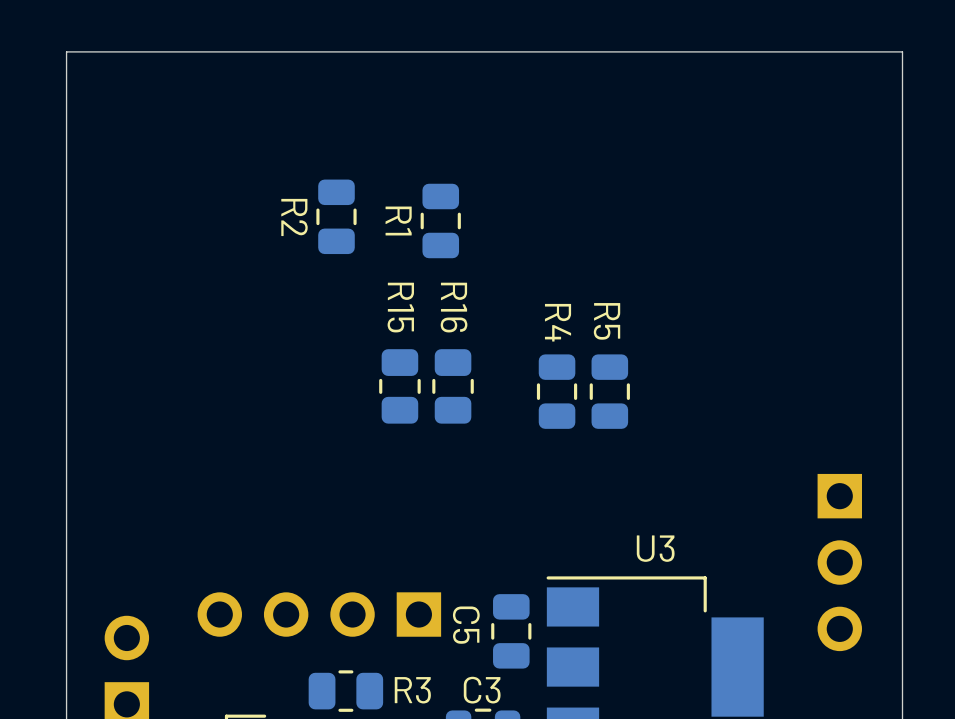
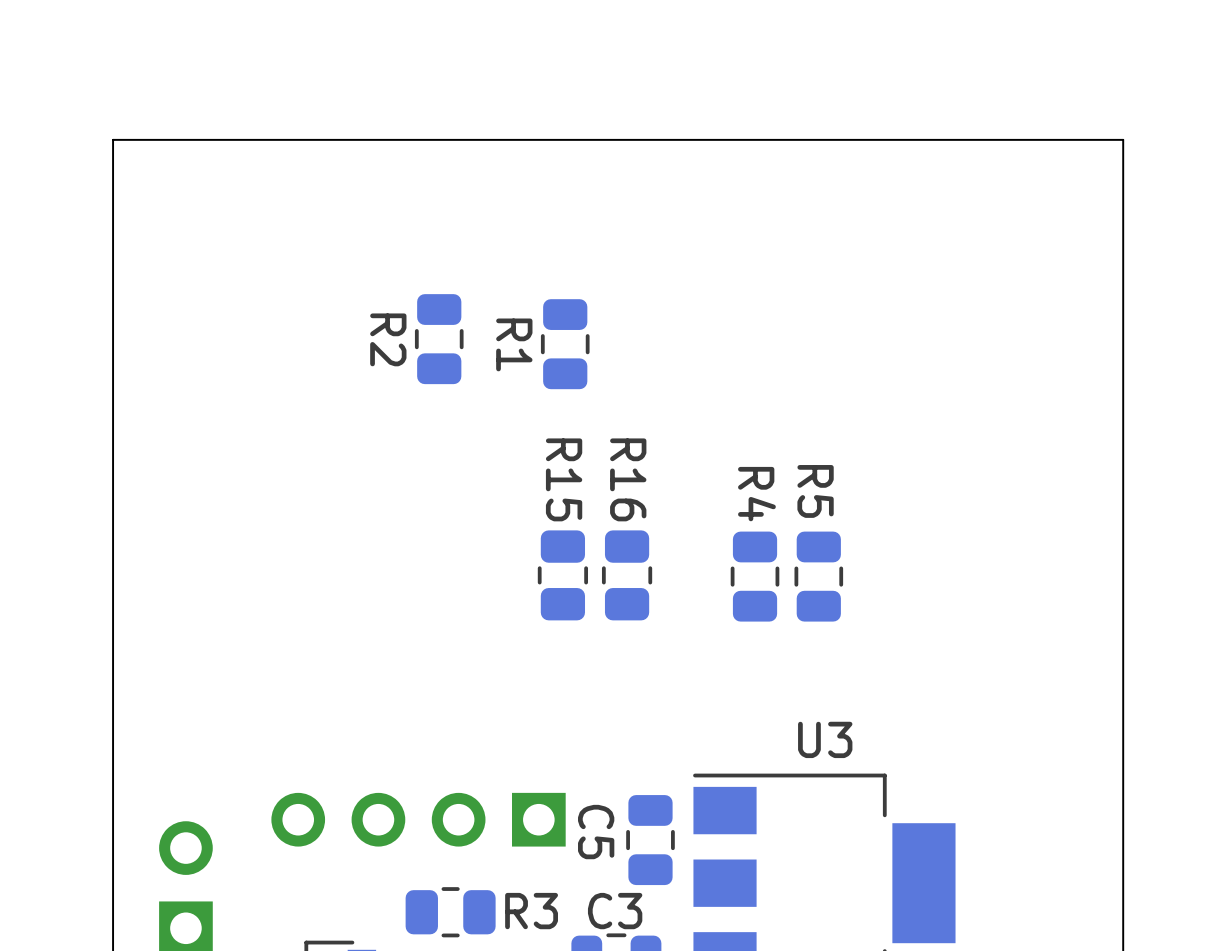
R16 position: (399, 386) -> (562, 575)
R15 position: (453, 386) -> (627, 575)
R4 position: (557, 391) -> (755, 576)
R5 position: (609, 391) -> (818, 576)
part: (839, 562) -> none

